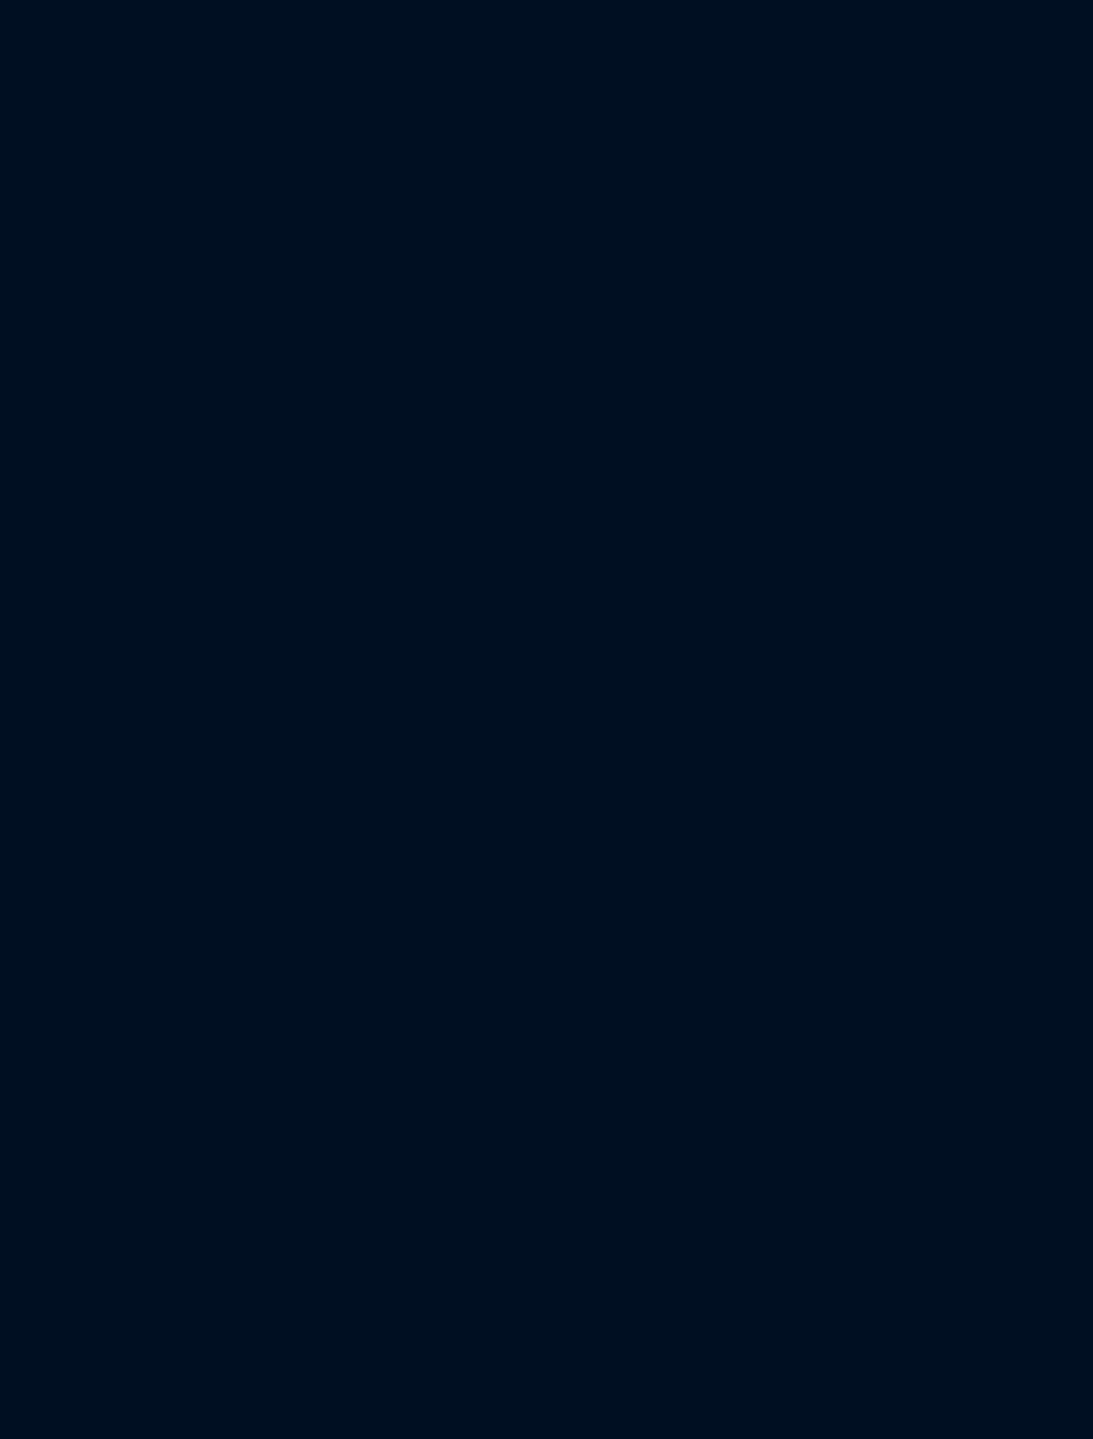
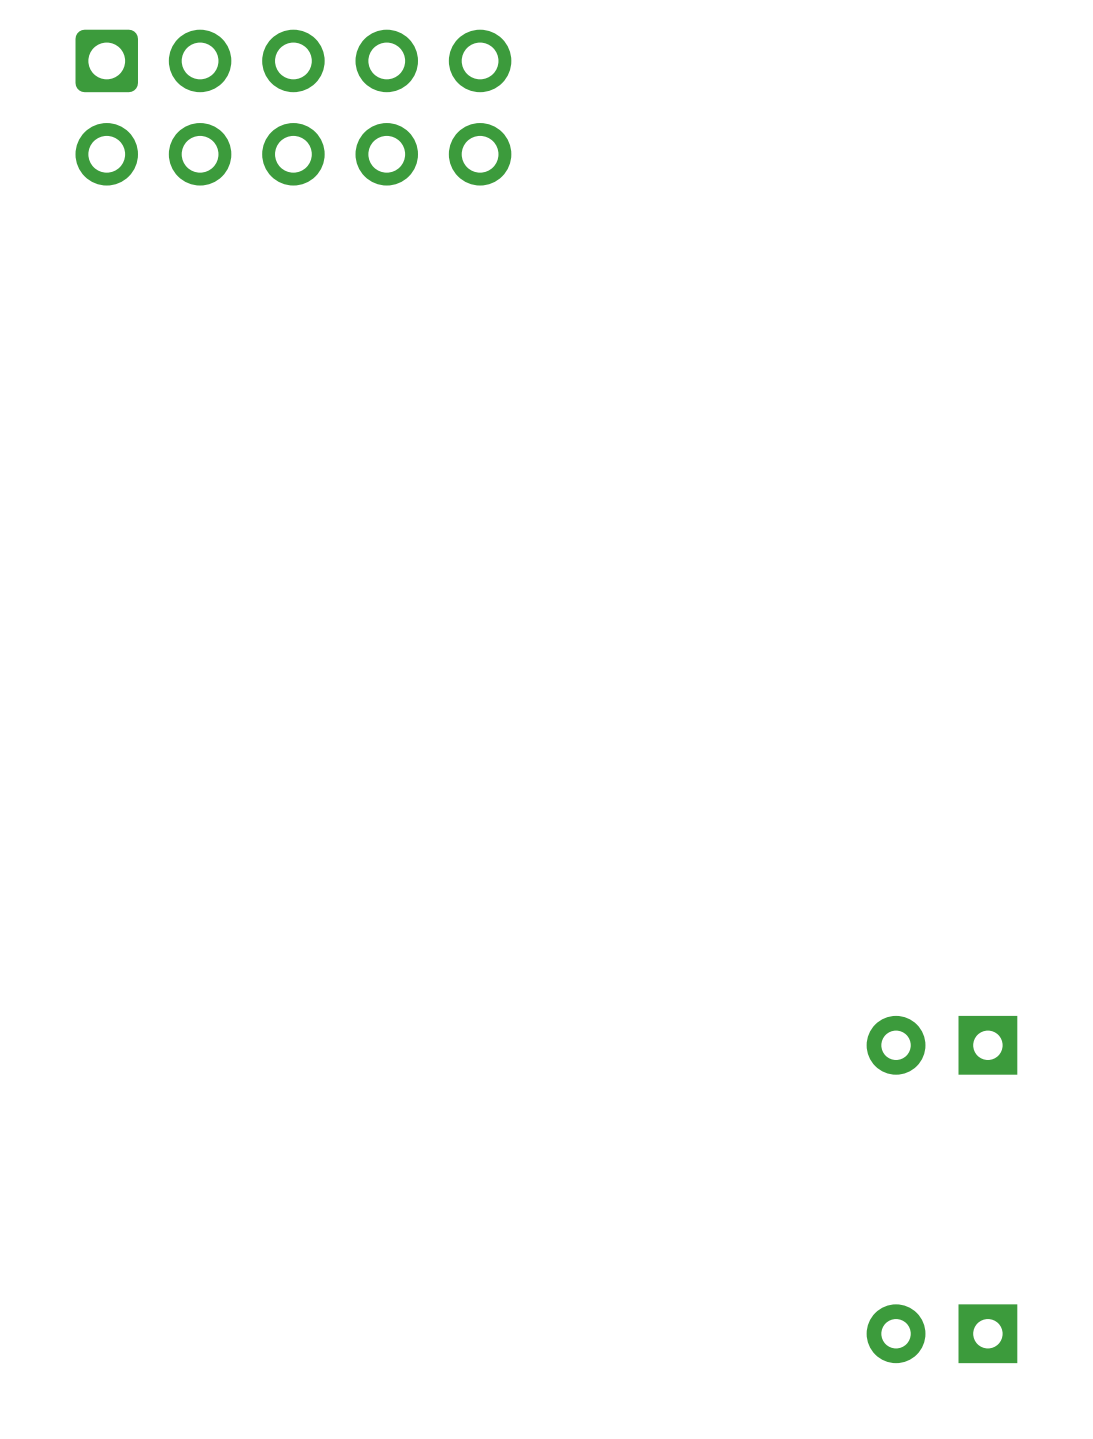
part: none -> (293, 107)
part: none -> (941, 1045)
part: none -> (941, 1333)

